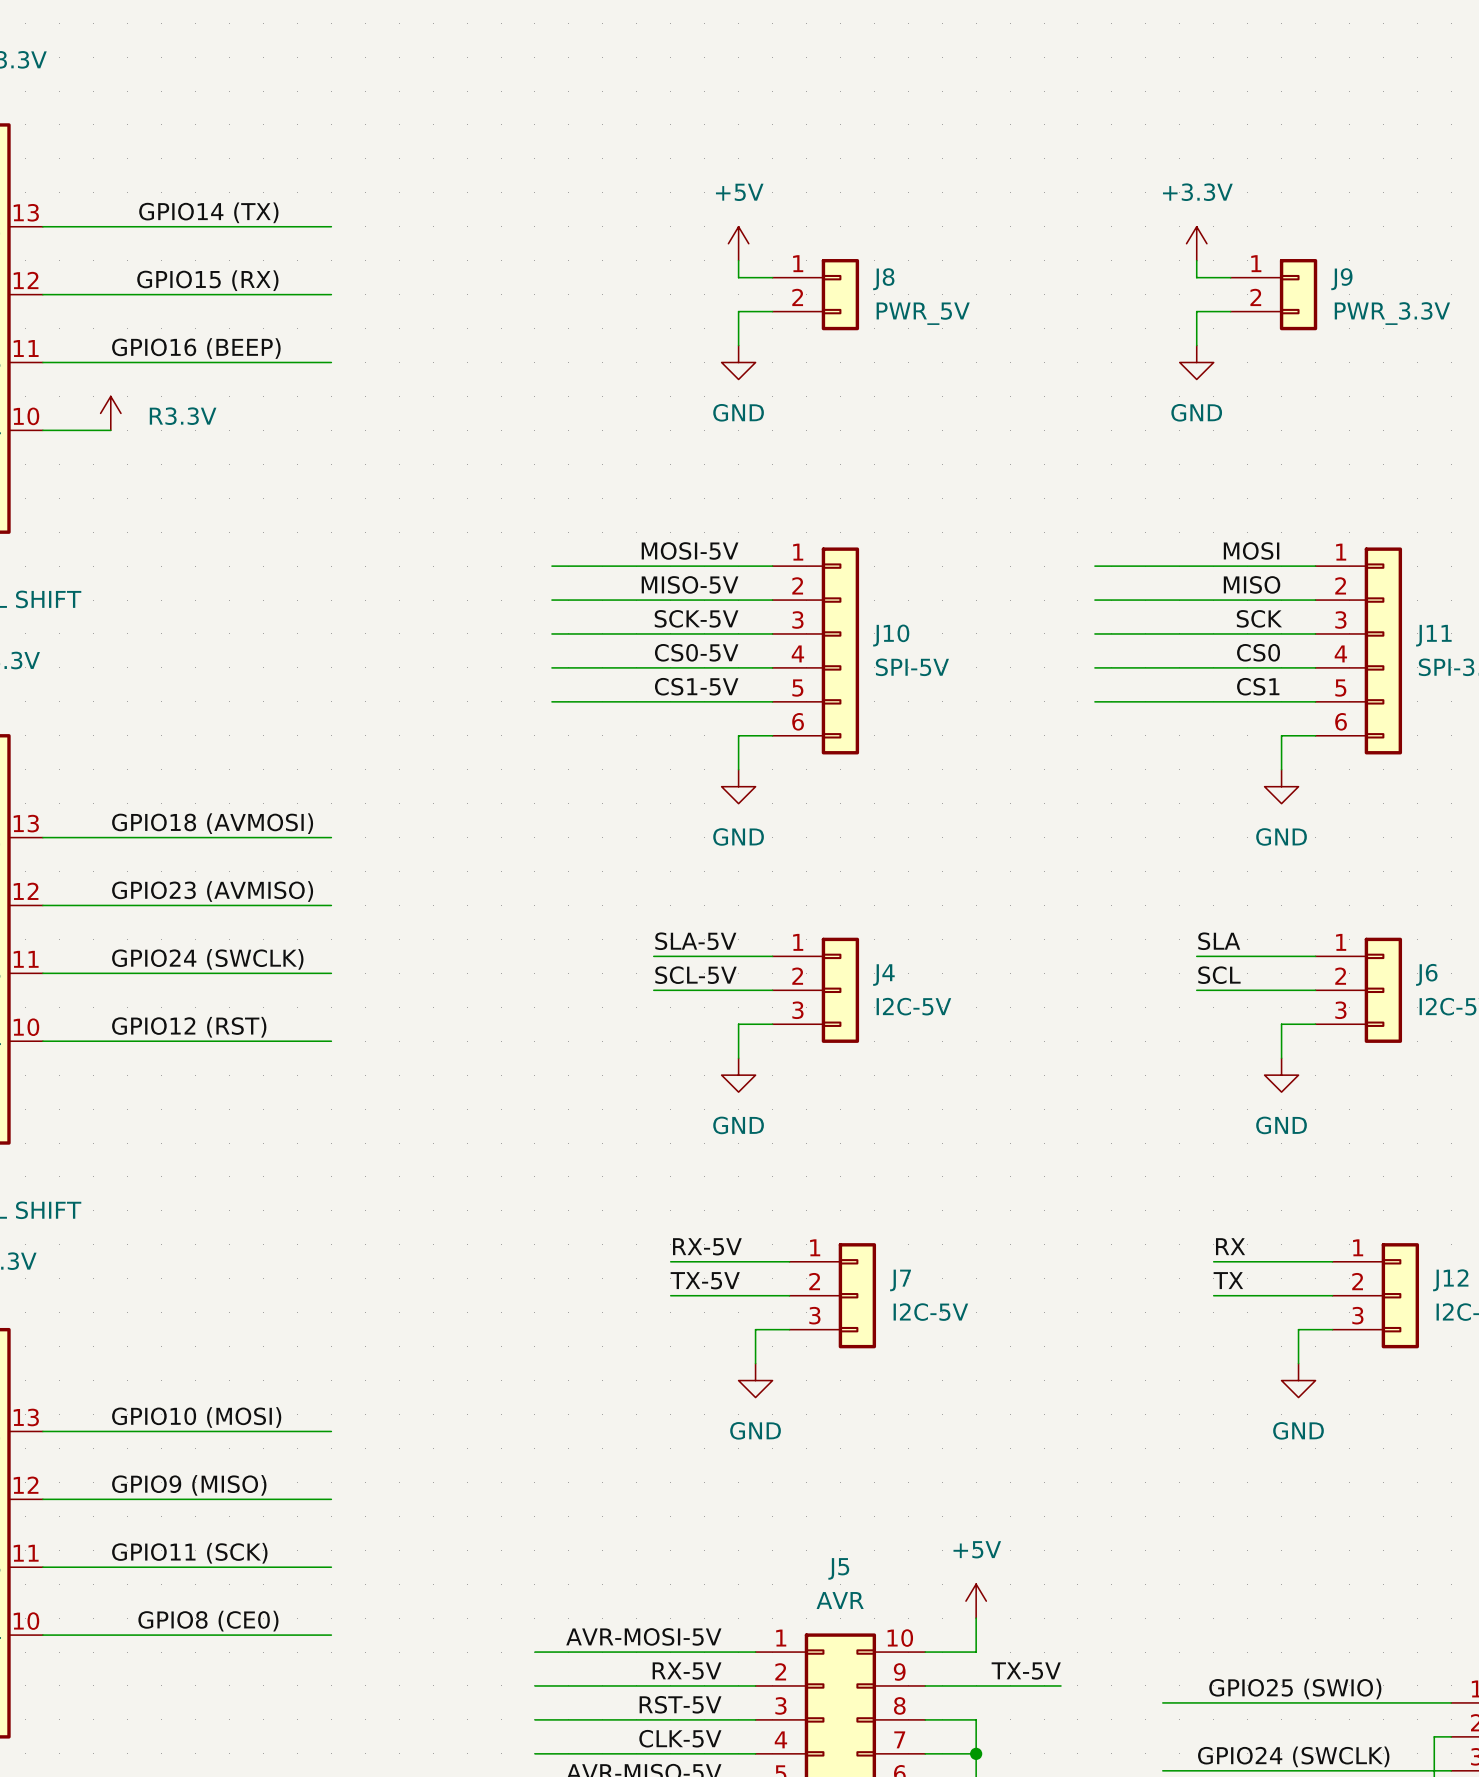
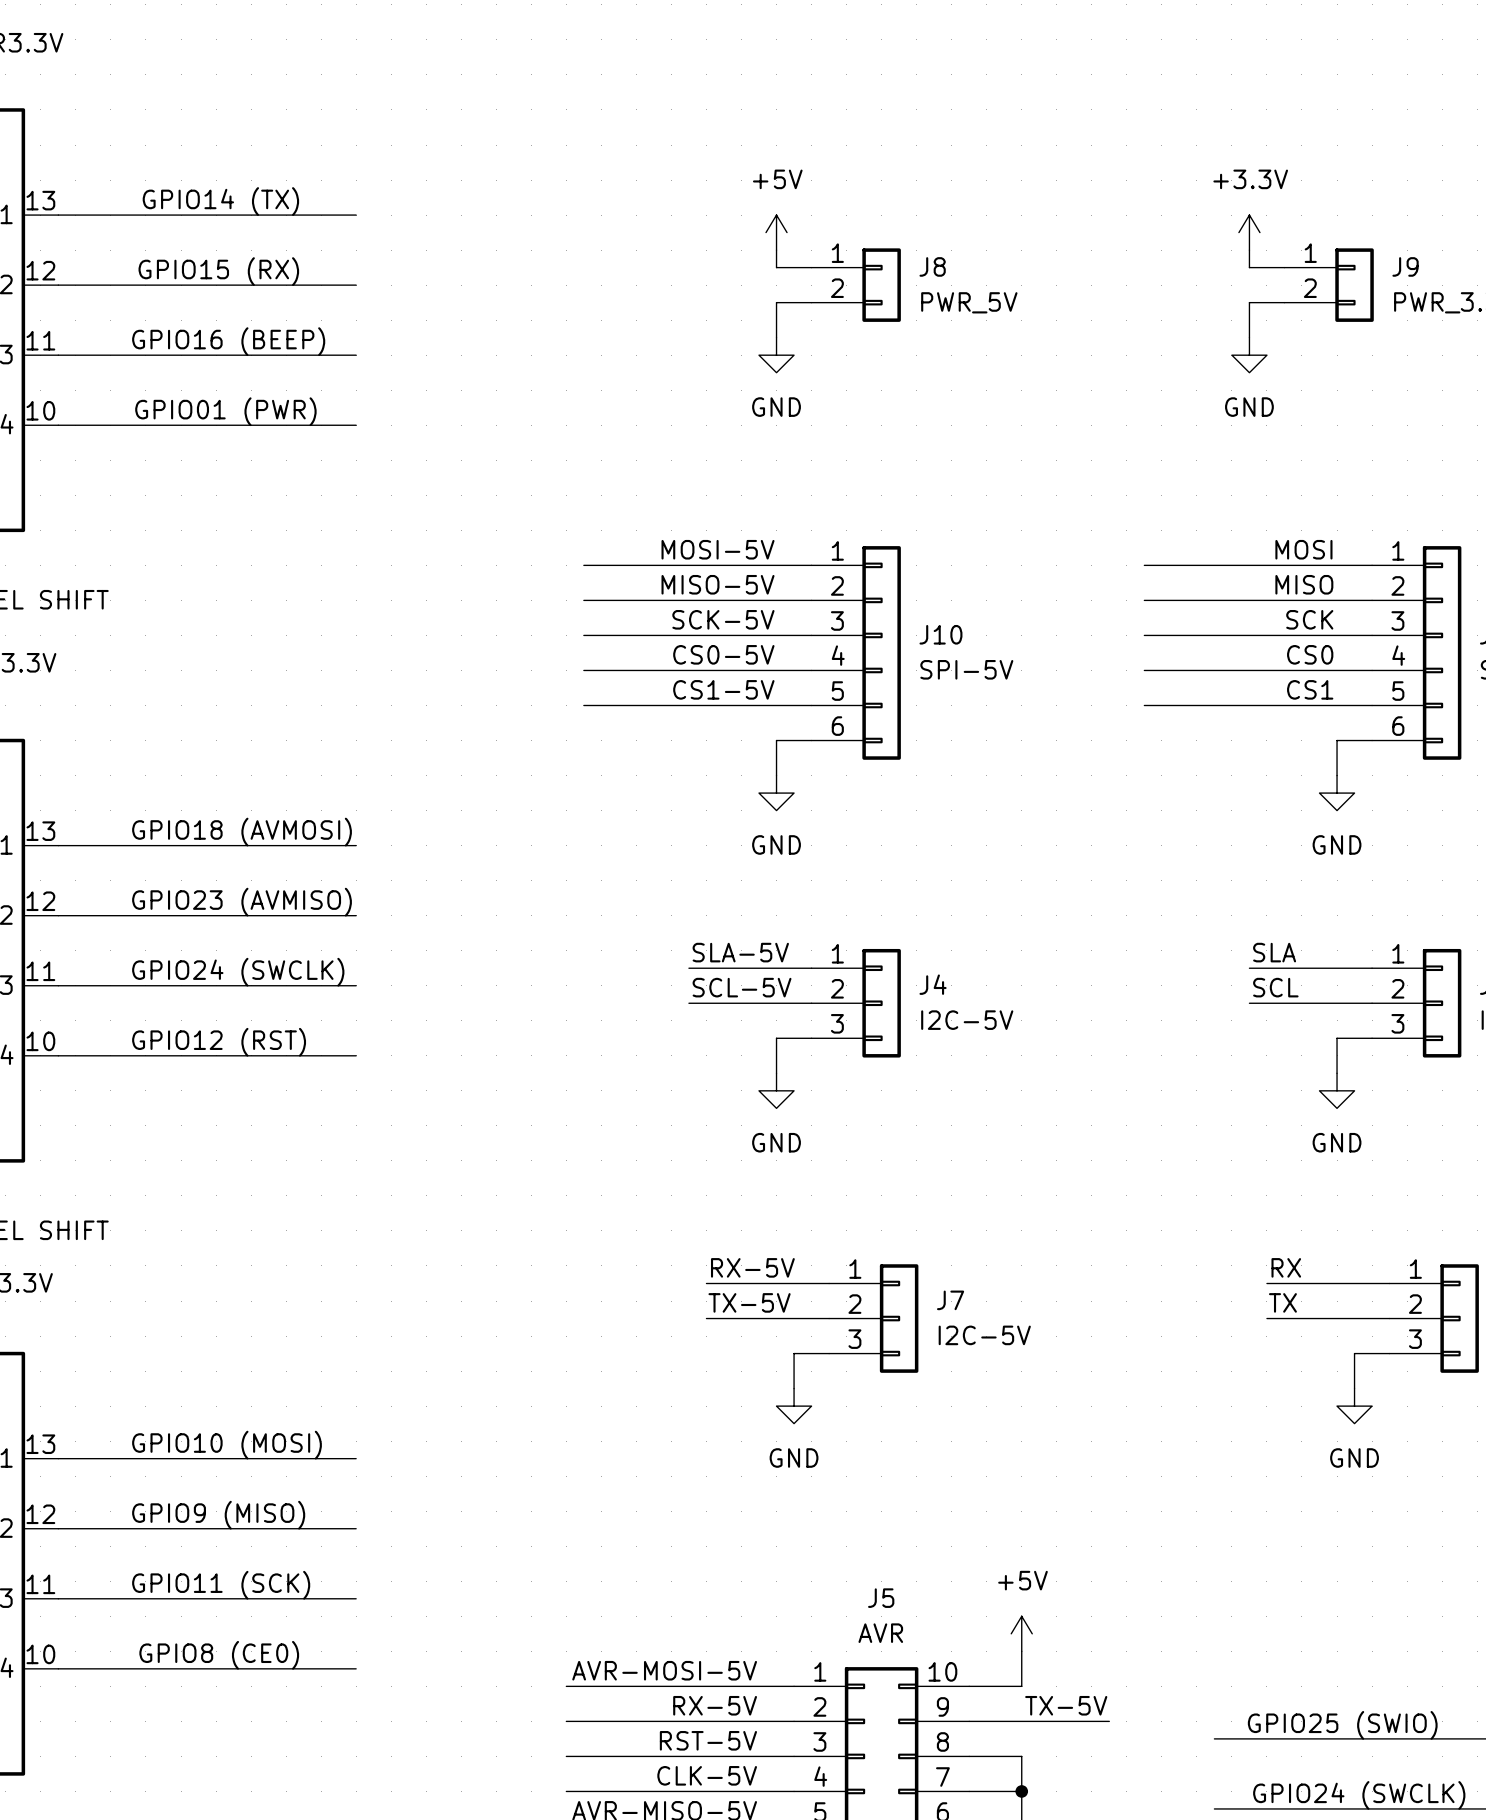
power symbol: R3.3V (110, 413) -> none
label: none -> GPIO01 (PWR) (225, 411)
wire: none -> (128, 425) (356, 425)

